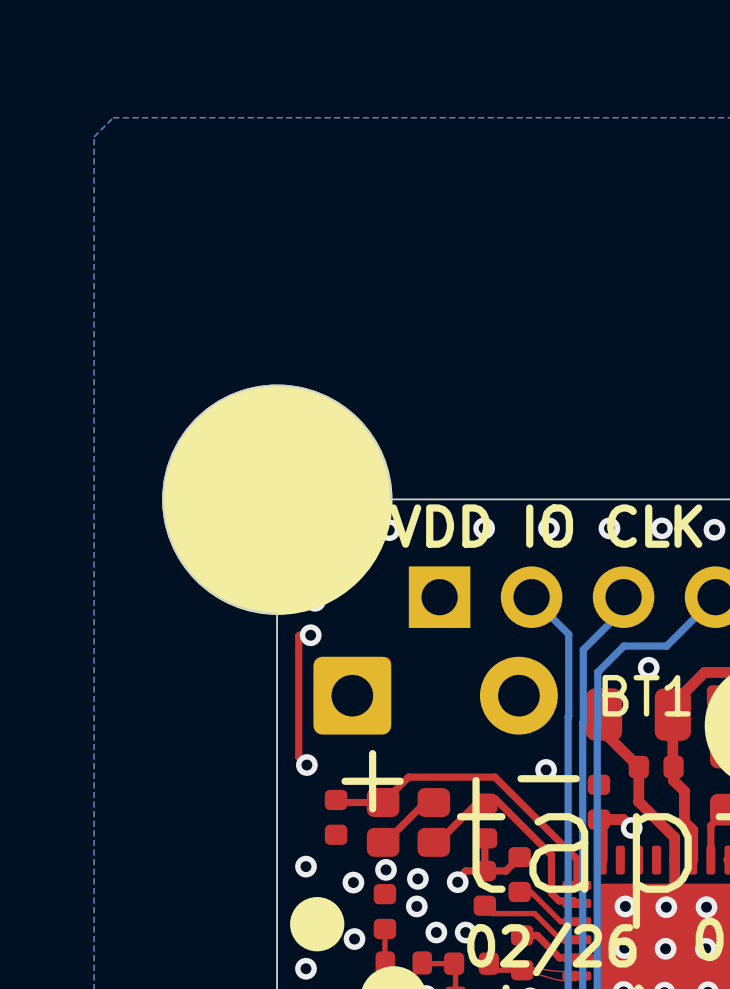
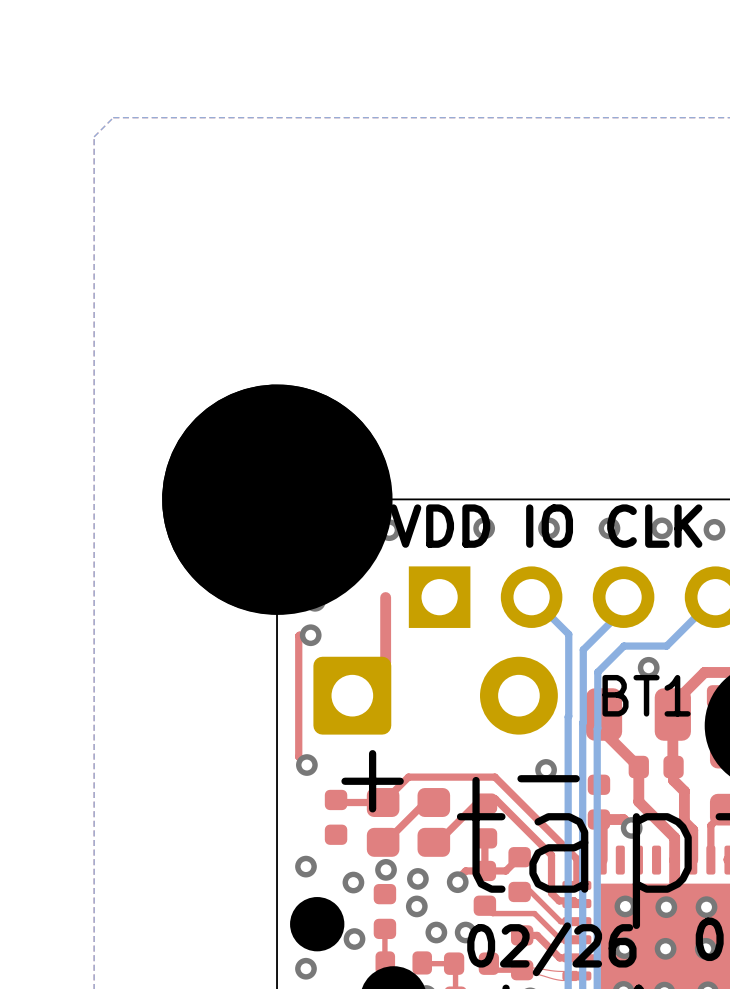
top track: none -> (385, 597) (385, 662)

